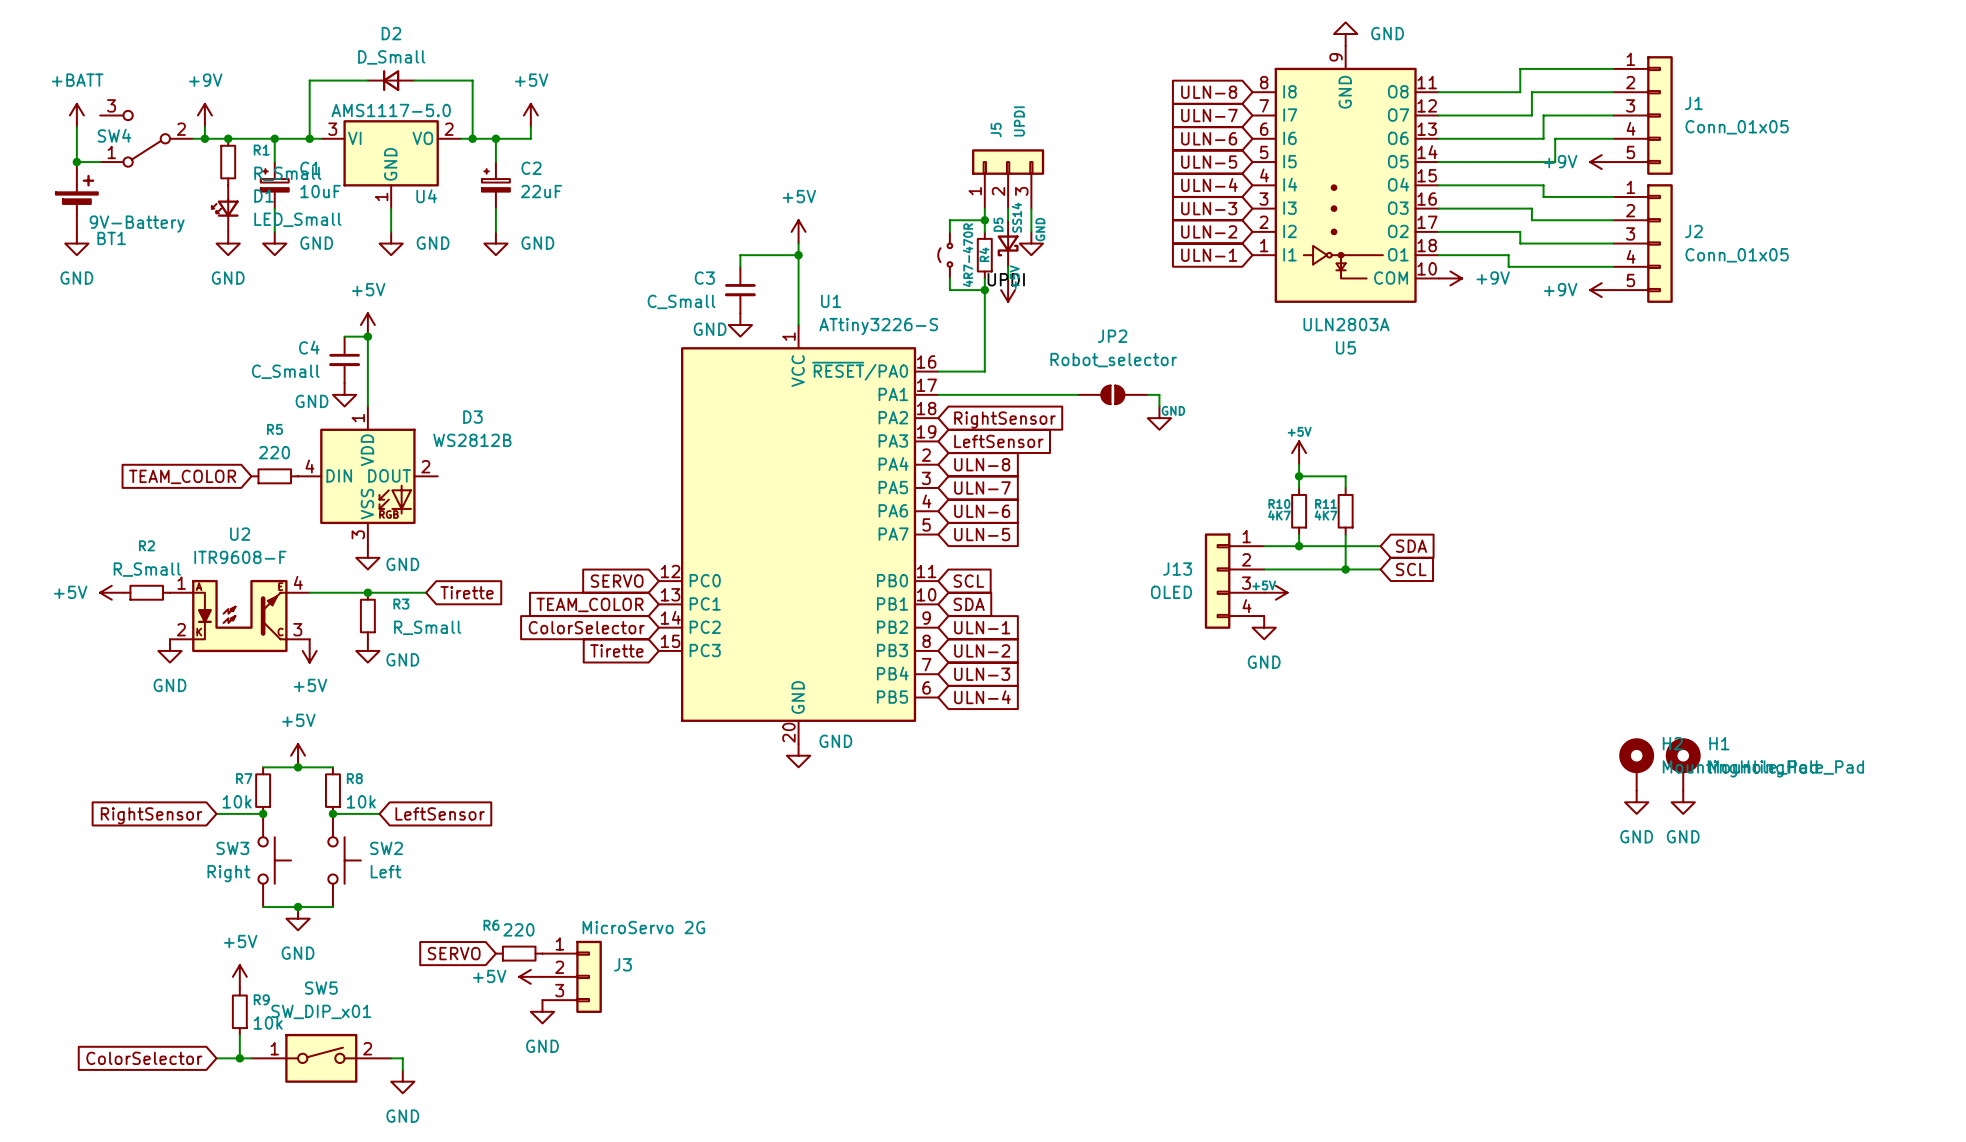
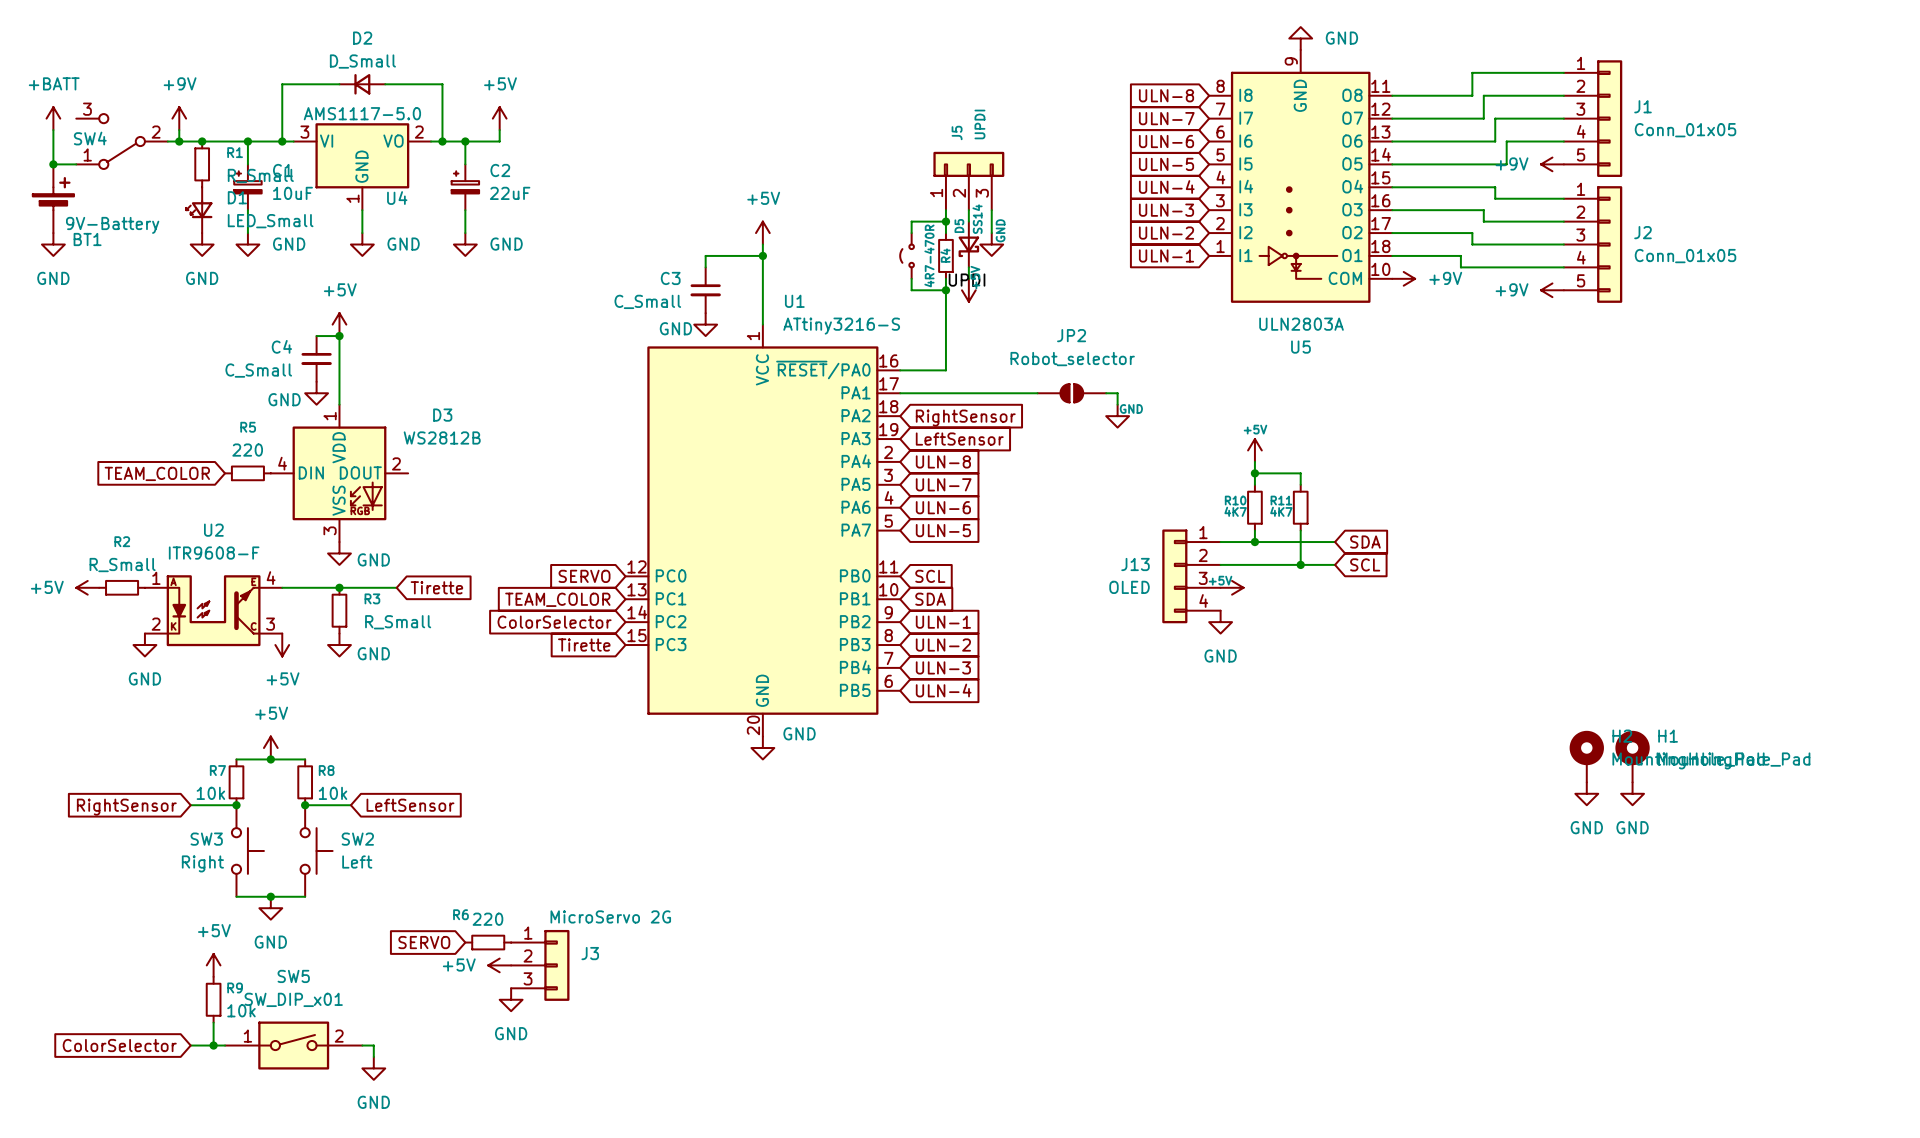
U1 value: ATtiny3226-S (878, 326) -> ATtiny3216-S (841, 326)

